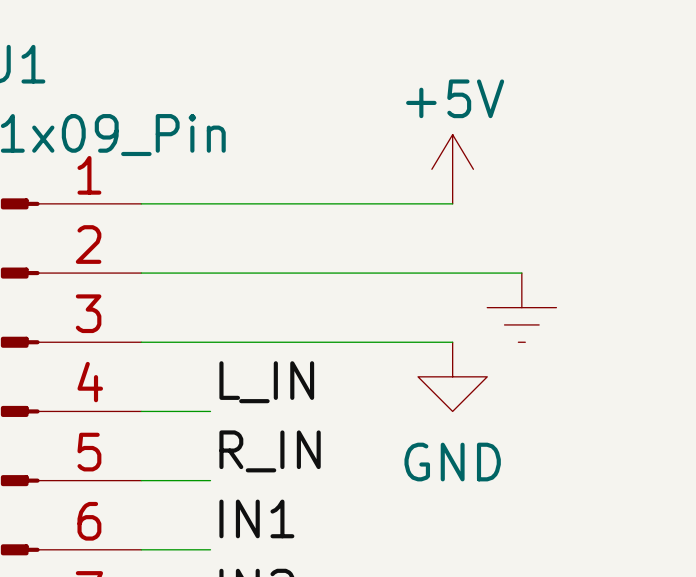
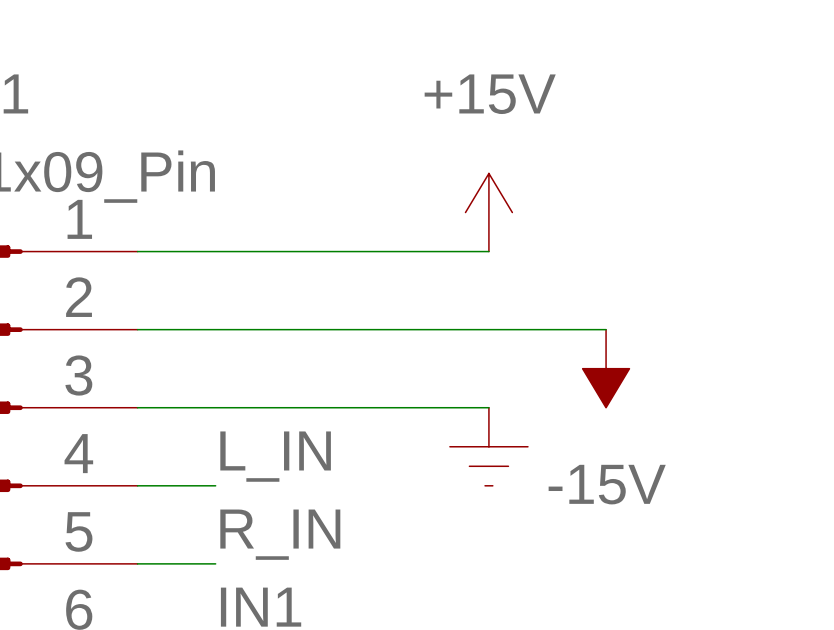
power symbol: +5V (452, 169) -> +15V (488, 212)
wire: none -> (567, 329) (606, 329)
power symbol: (521, 307) -> none
power symbol: none -> -15V (606, 368)
power symbol shape: [418, 342, 488, 412] -> [449, 407, 528, 486]
power symbol text: GND (452, 462) -> none

